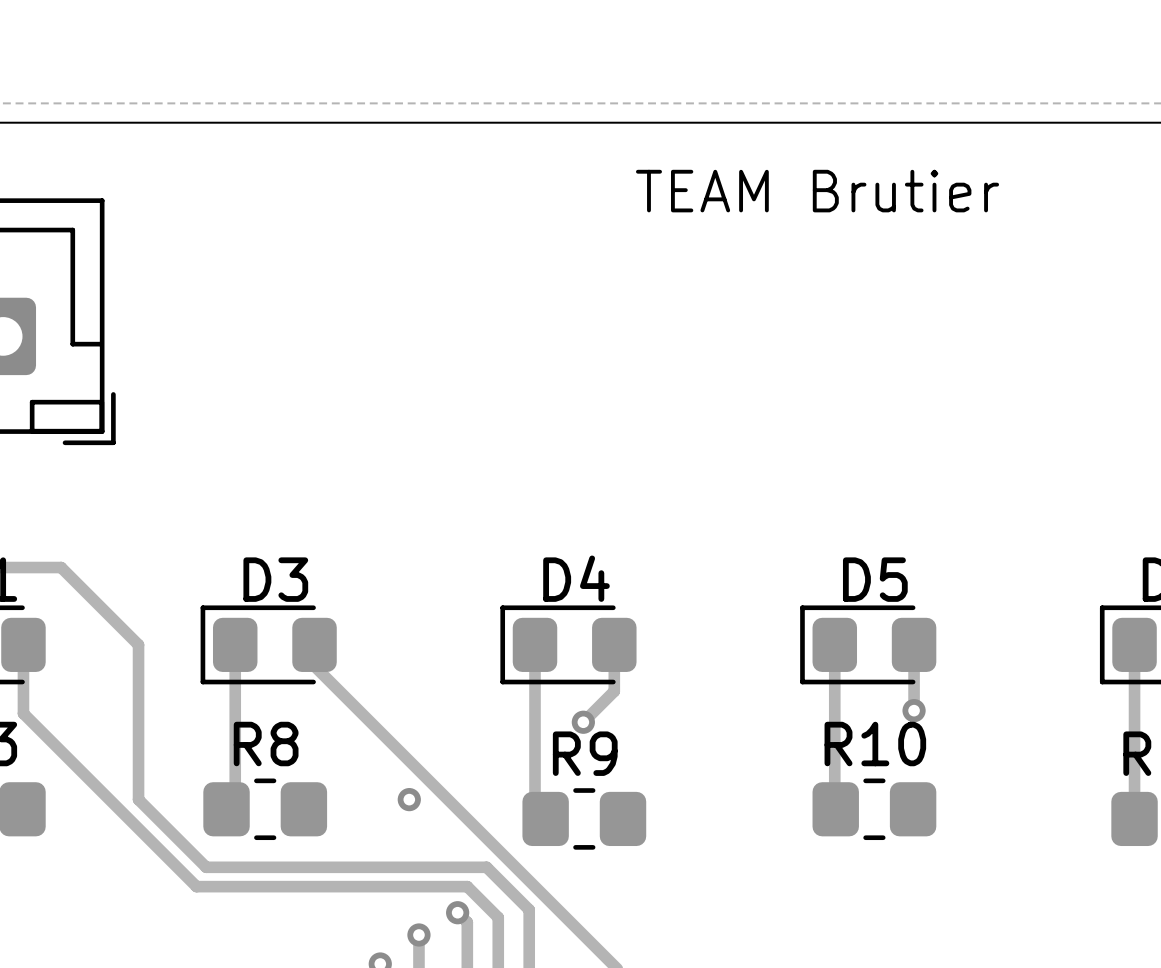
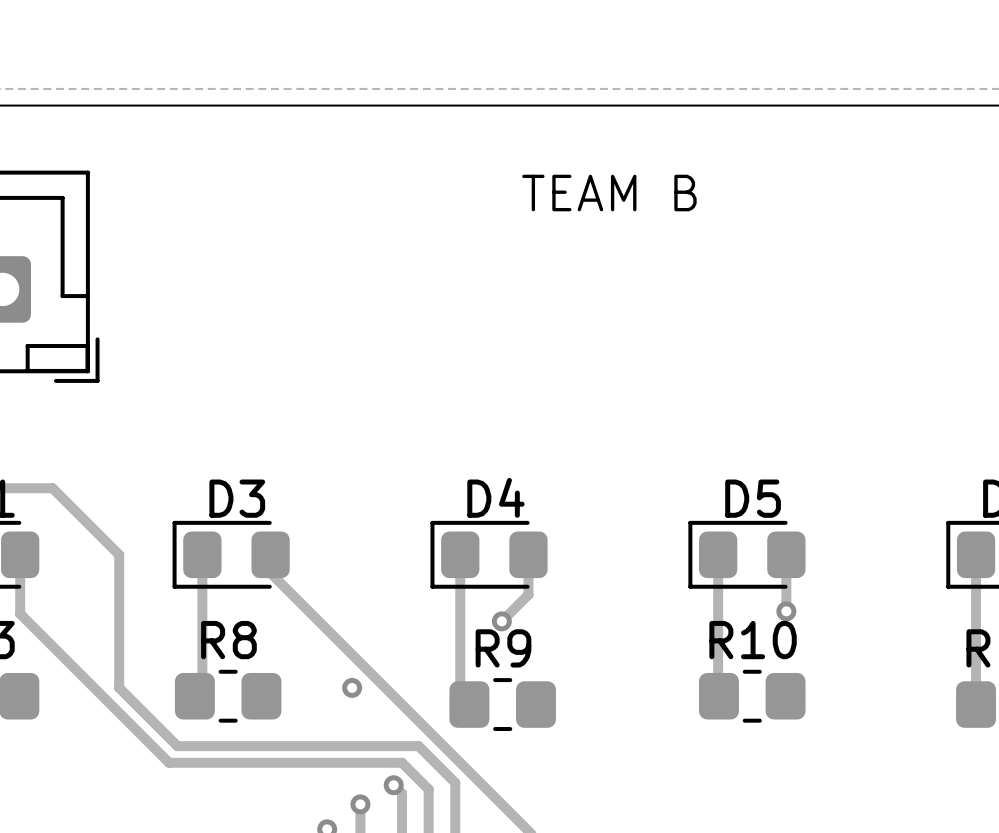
text: TEAM Brutier (817, 191) -> TEAM B (609, 193)

